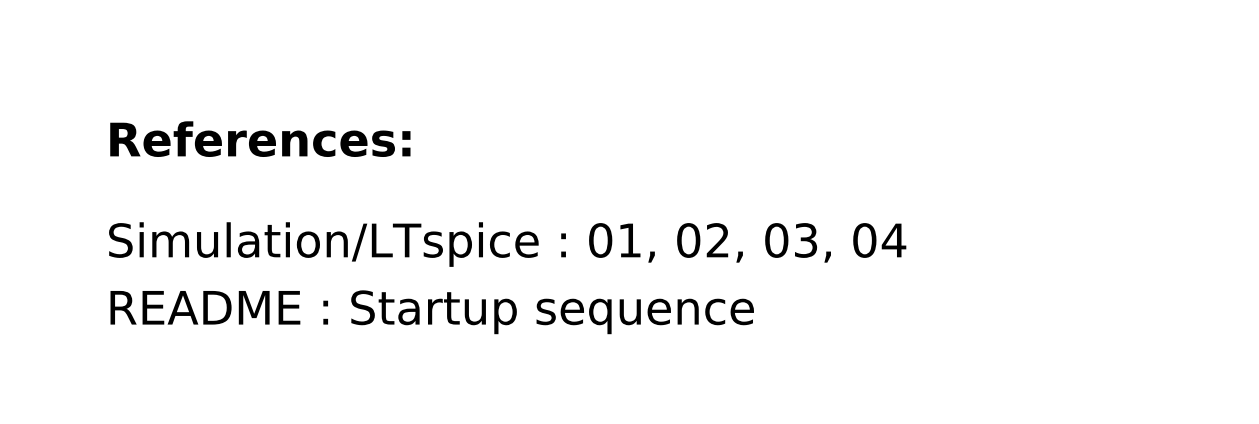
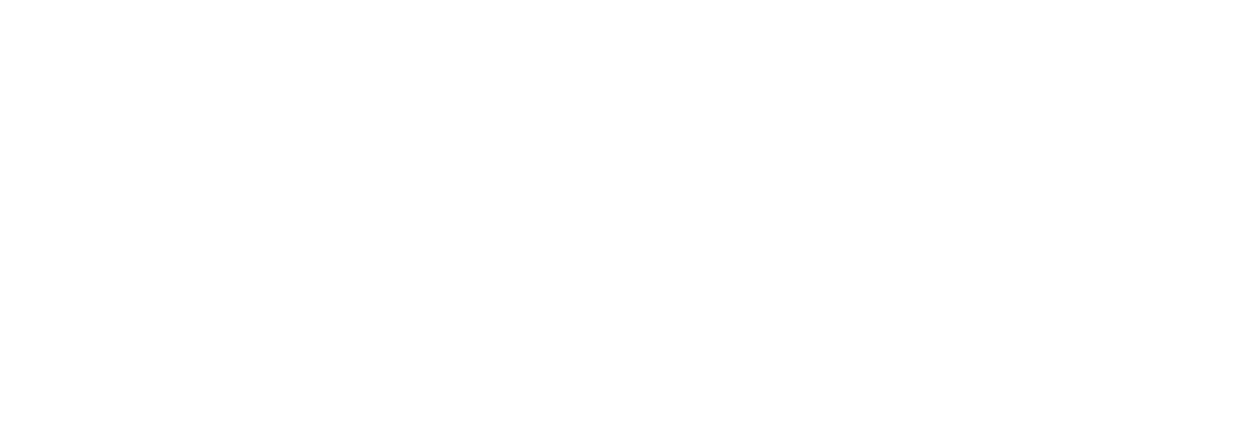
text: References: (260, 139) -> none
text: Simulation/LTspice : 01, 02, 03, 04 (507, 244) -> none
text: README : Startup sequence (432, 312) -> none

